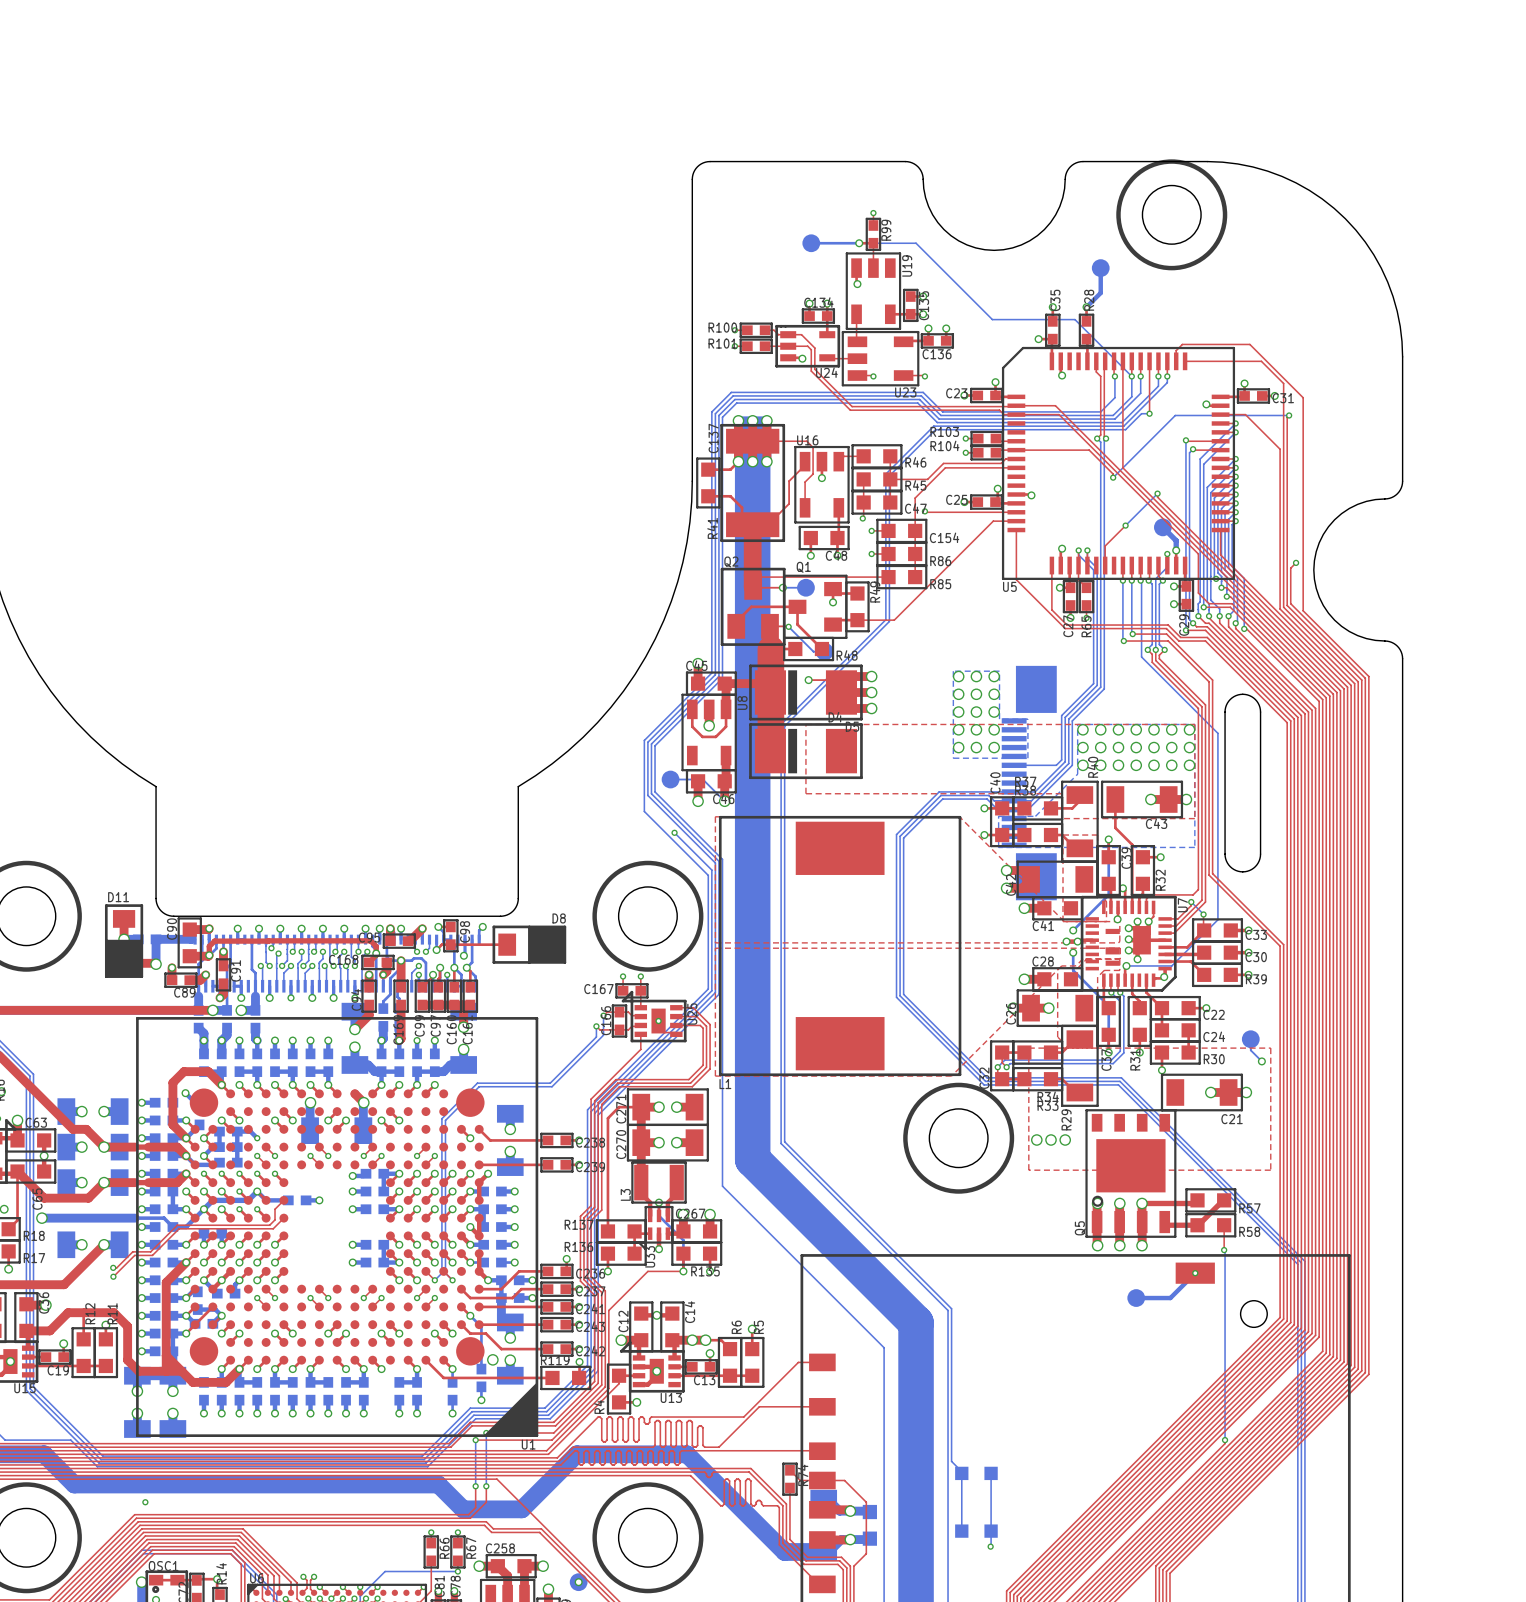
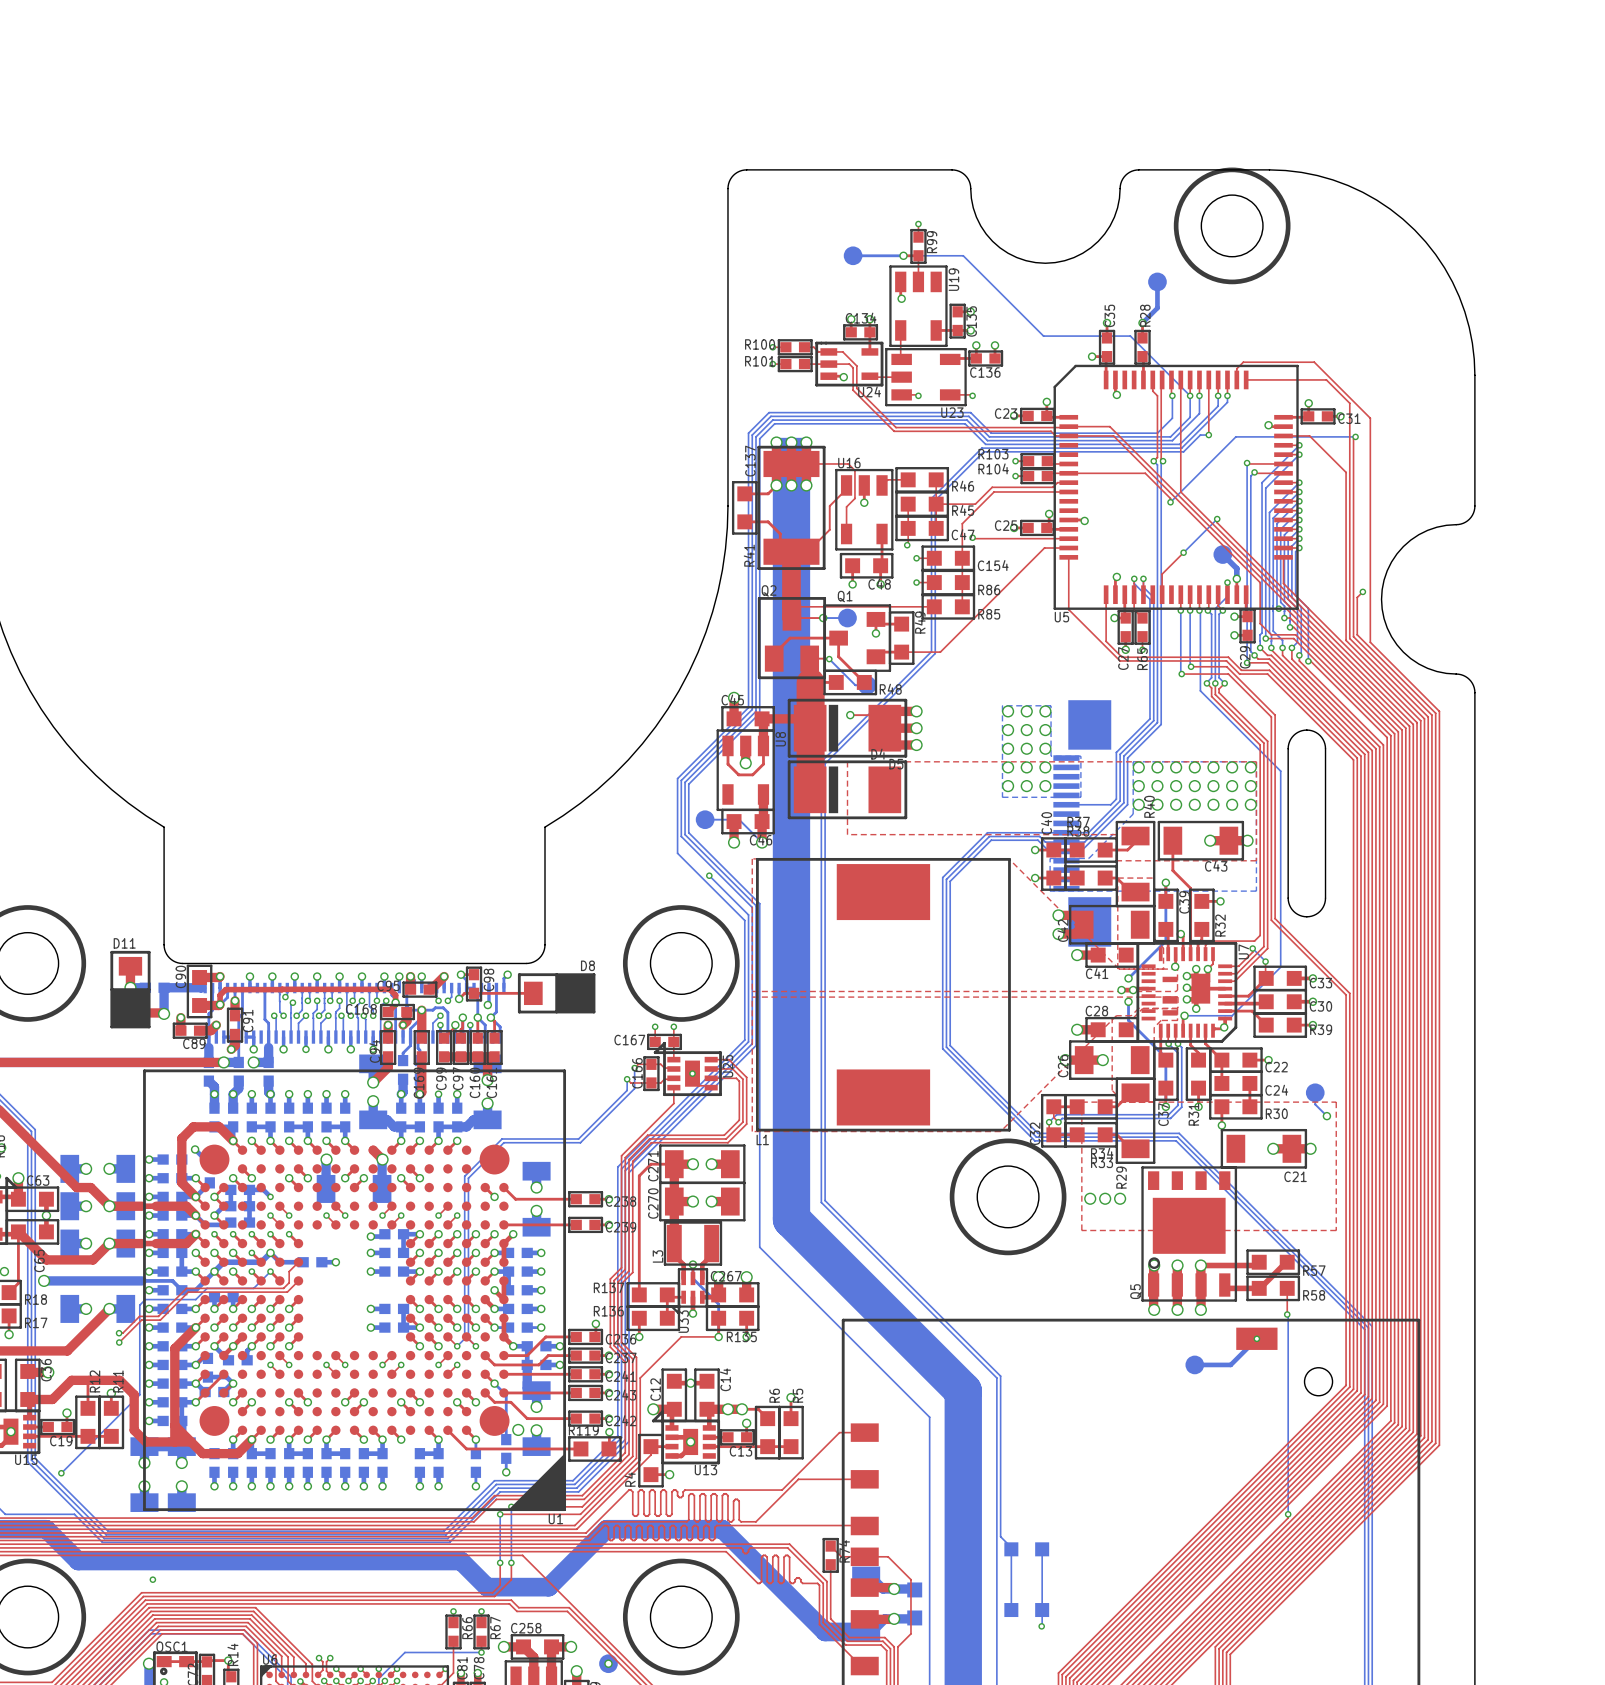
bottom track: none -> (270, 1271) (253, 1288) (207, 1288) (195, 1299) (145, 1299) (139, 1305) (139, 1394) (61, 1473)
via: none -> (61, 1473)

